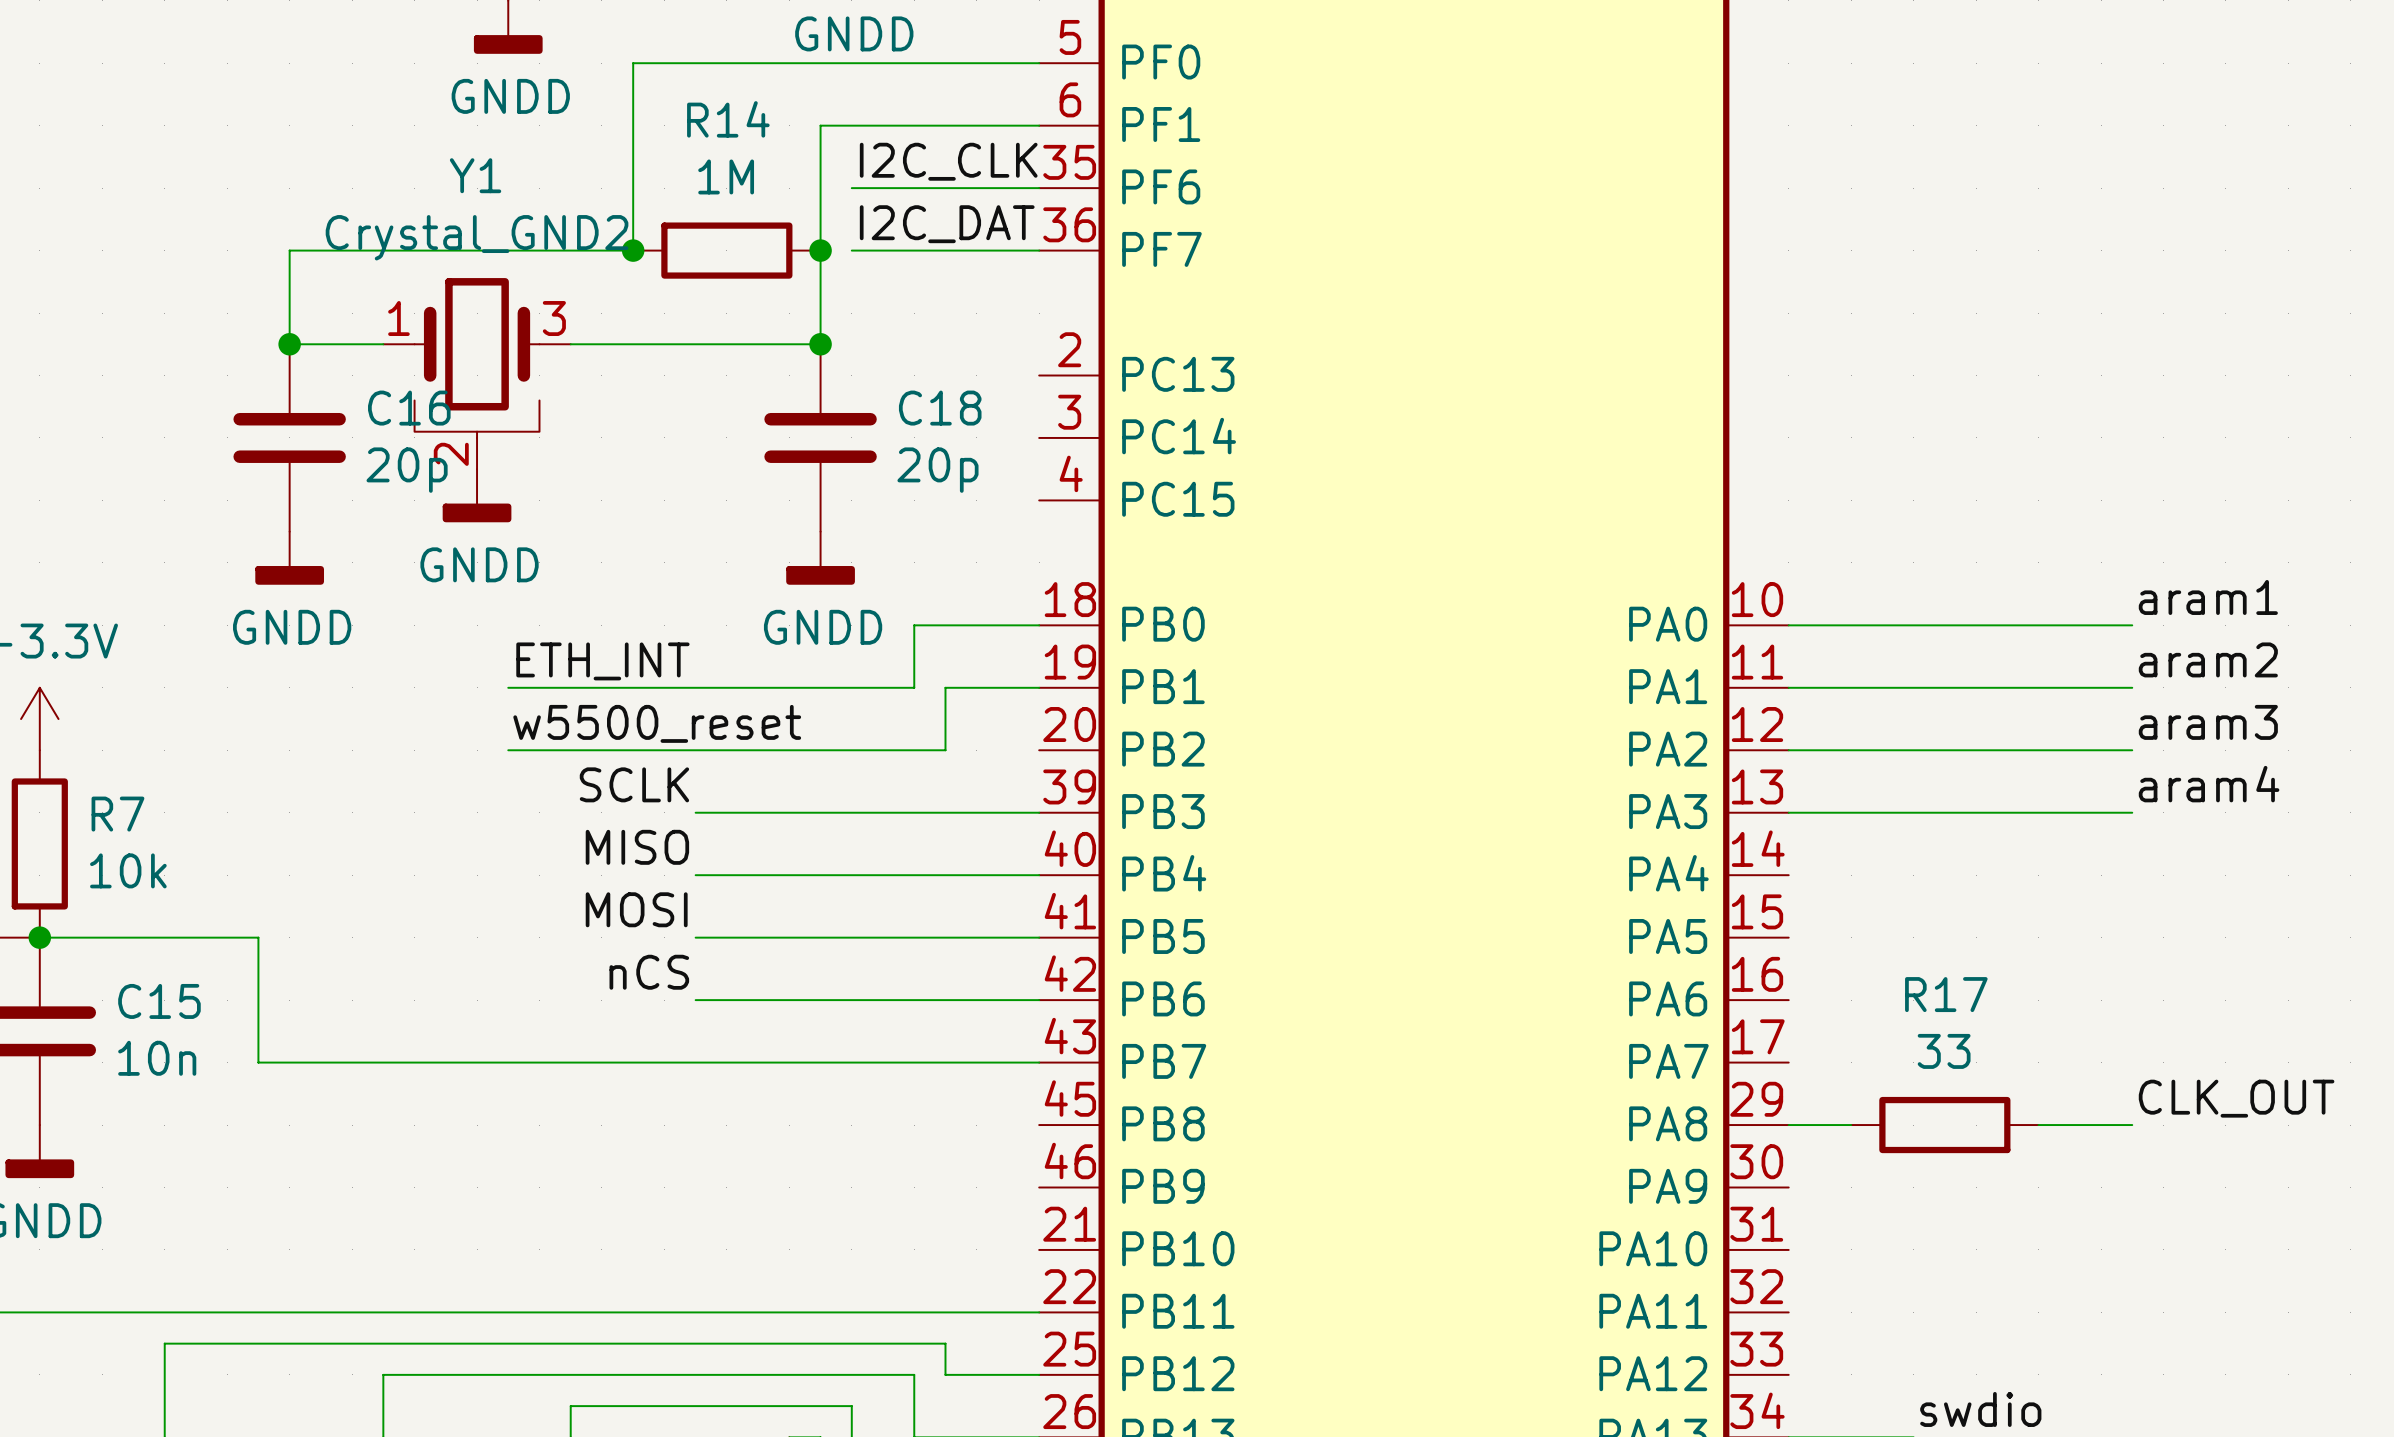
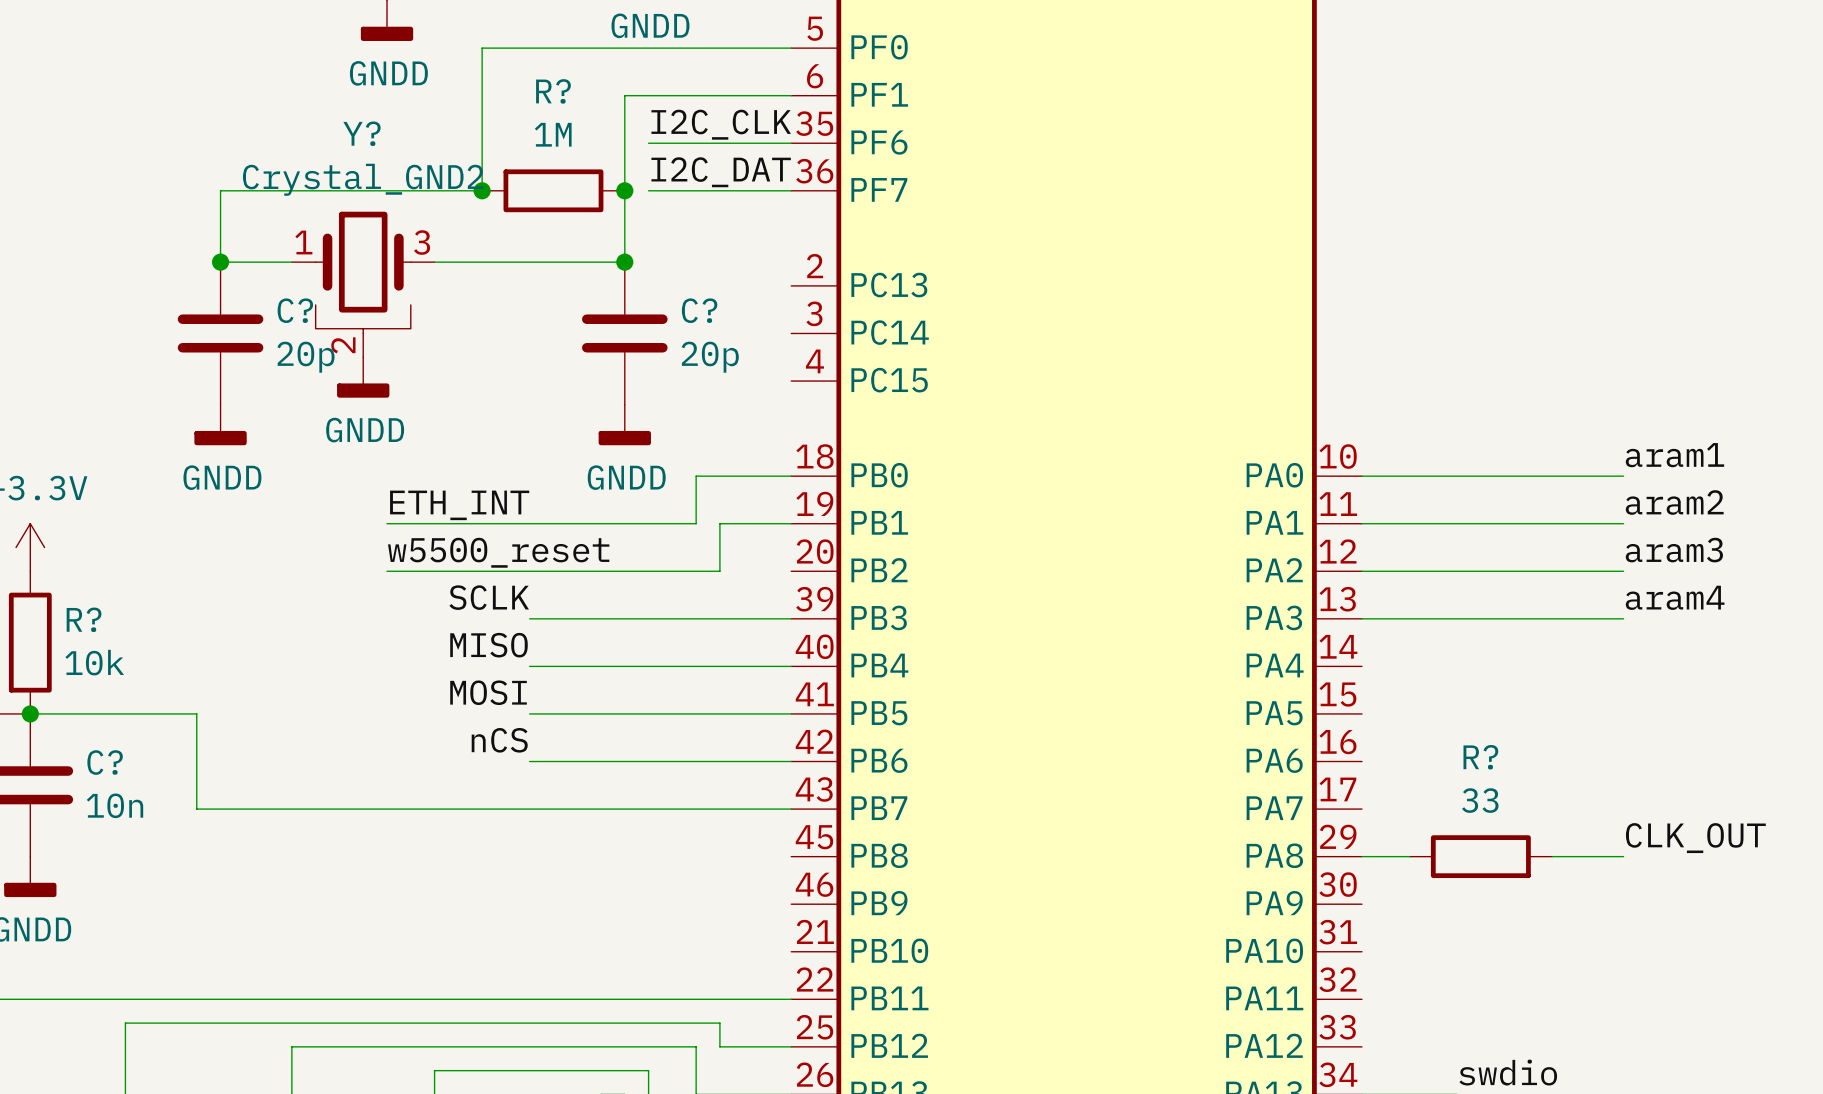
R14 name: R14 (728, 119) -> R? (553, 91)
Y1 name: Y1 (475, 175) -> Y? (361, 133)
C16 name: C16 (409, 408) -> C? (295, 310)
C18 name: C18 (940, 408) -> C? (699, 310)
R7 name: R7 (117, 814) -> R? (84, 619)
R17 name: R17 (1946, 994) -> R? (1480, 757)
C15 name: C15 (159, 1001) -> C? (105, 762)

